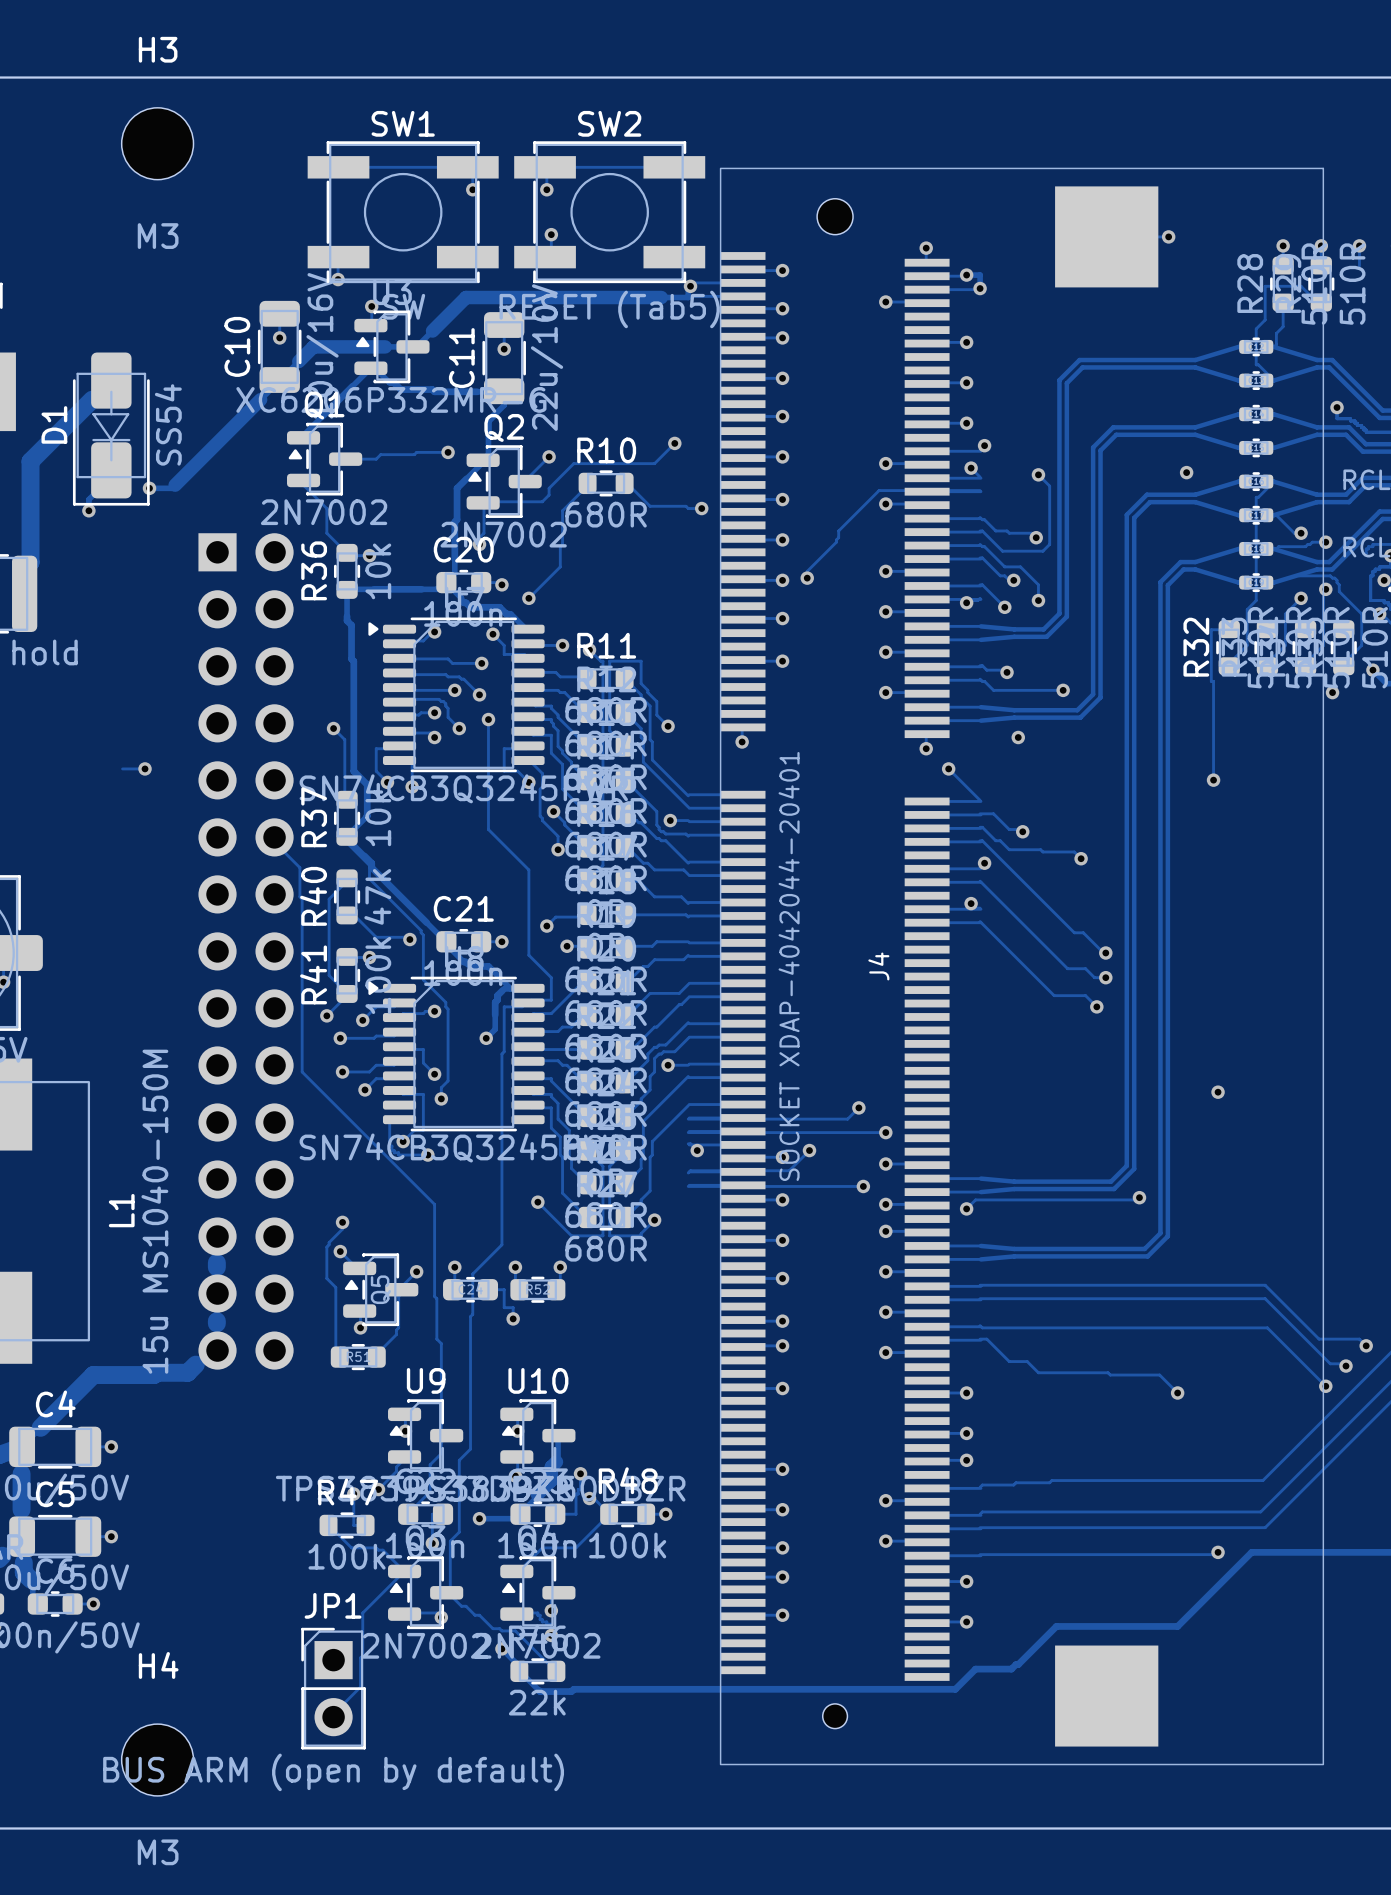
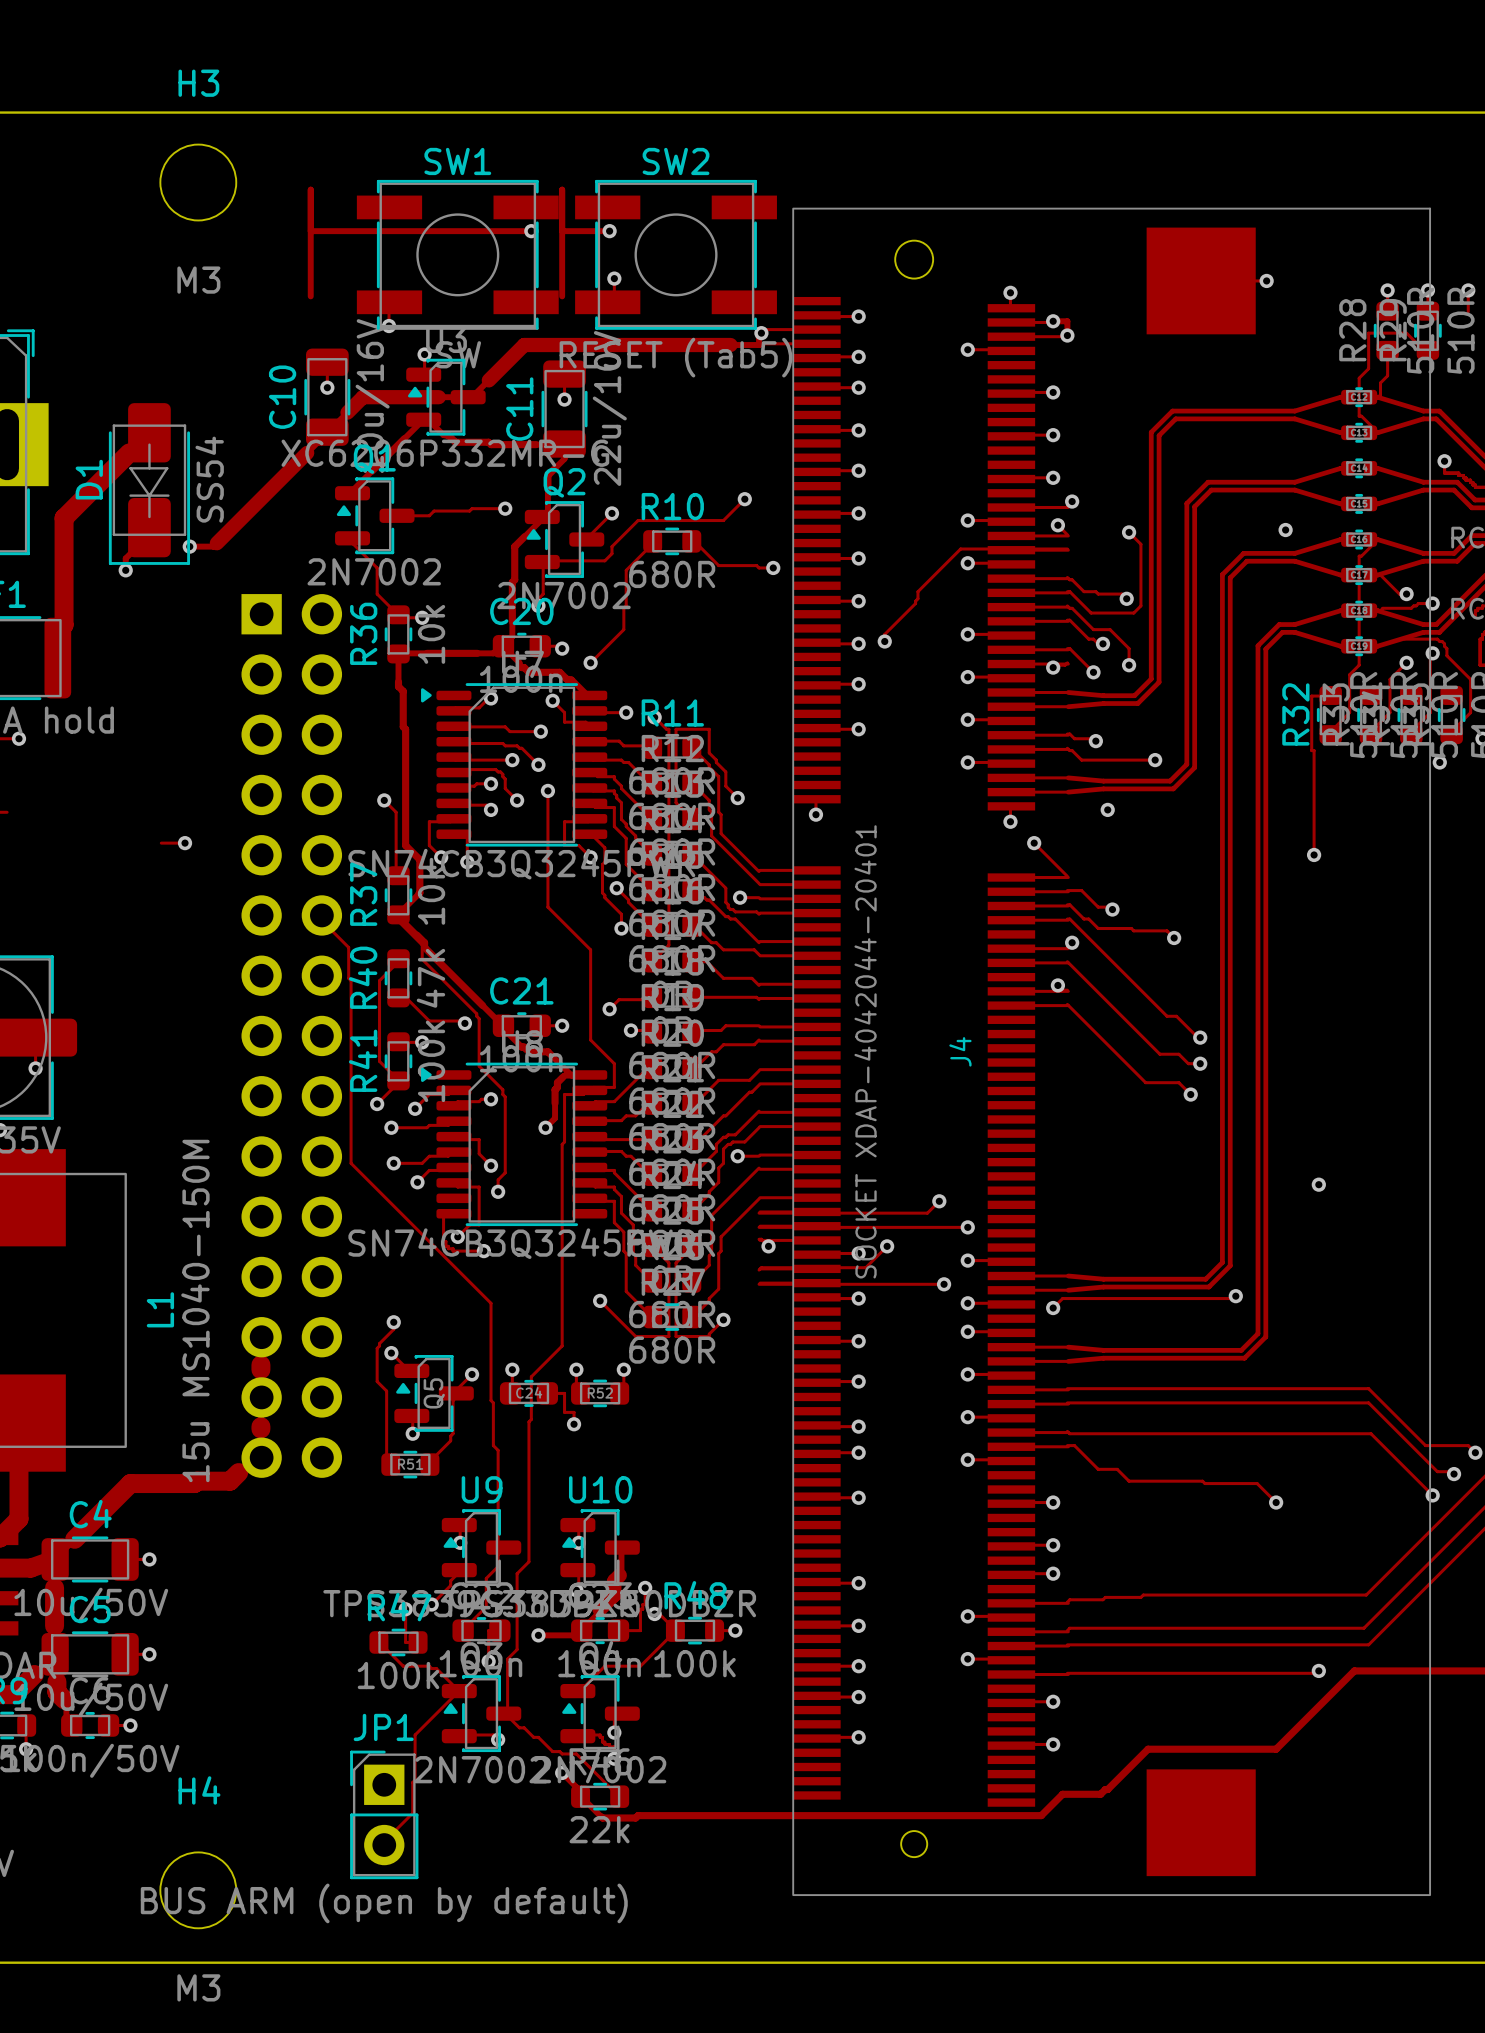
track: none -> (310, 189) (310, 296)
track: none -> (562, 189) (562, 296)
track: (338, 167) (468, 167) (472, 171) (472, 189) -> (310, 231) (531, 231)
track: (681, 167) (551, 167) (546, 171) (546, 189) -> (562, 231) (609, 231)

